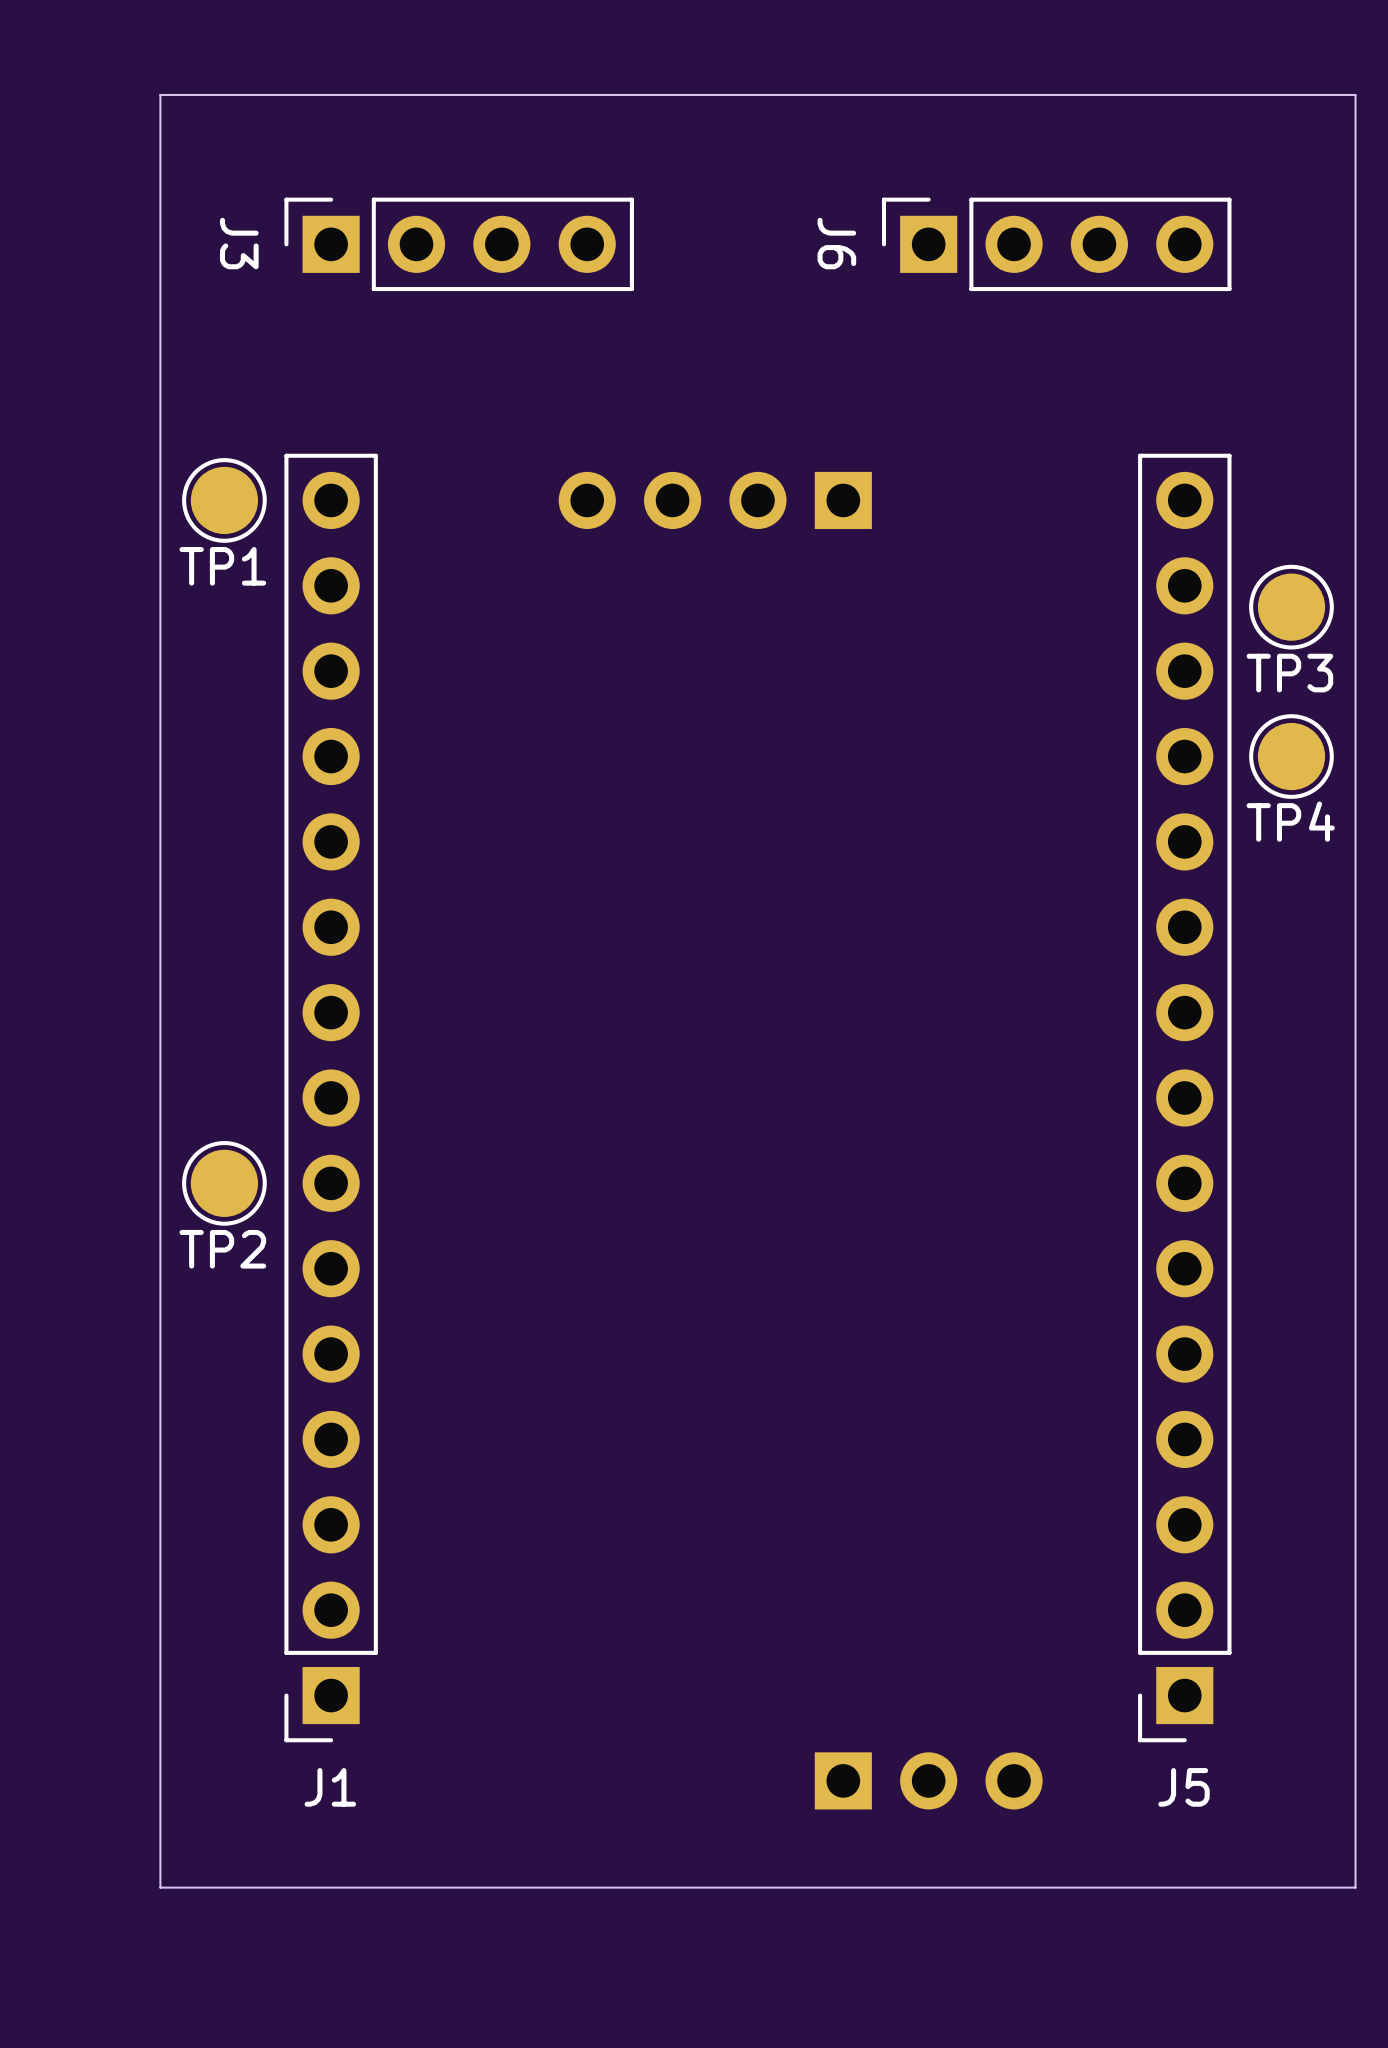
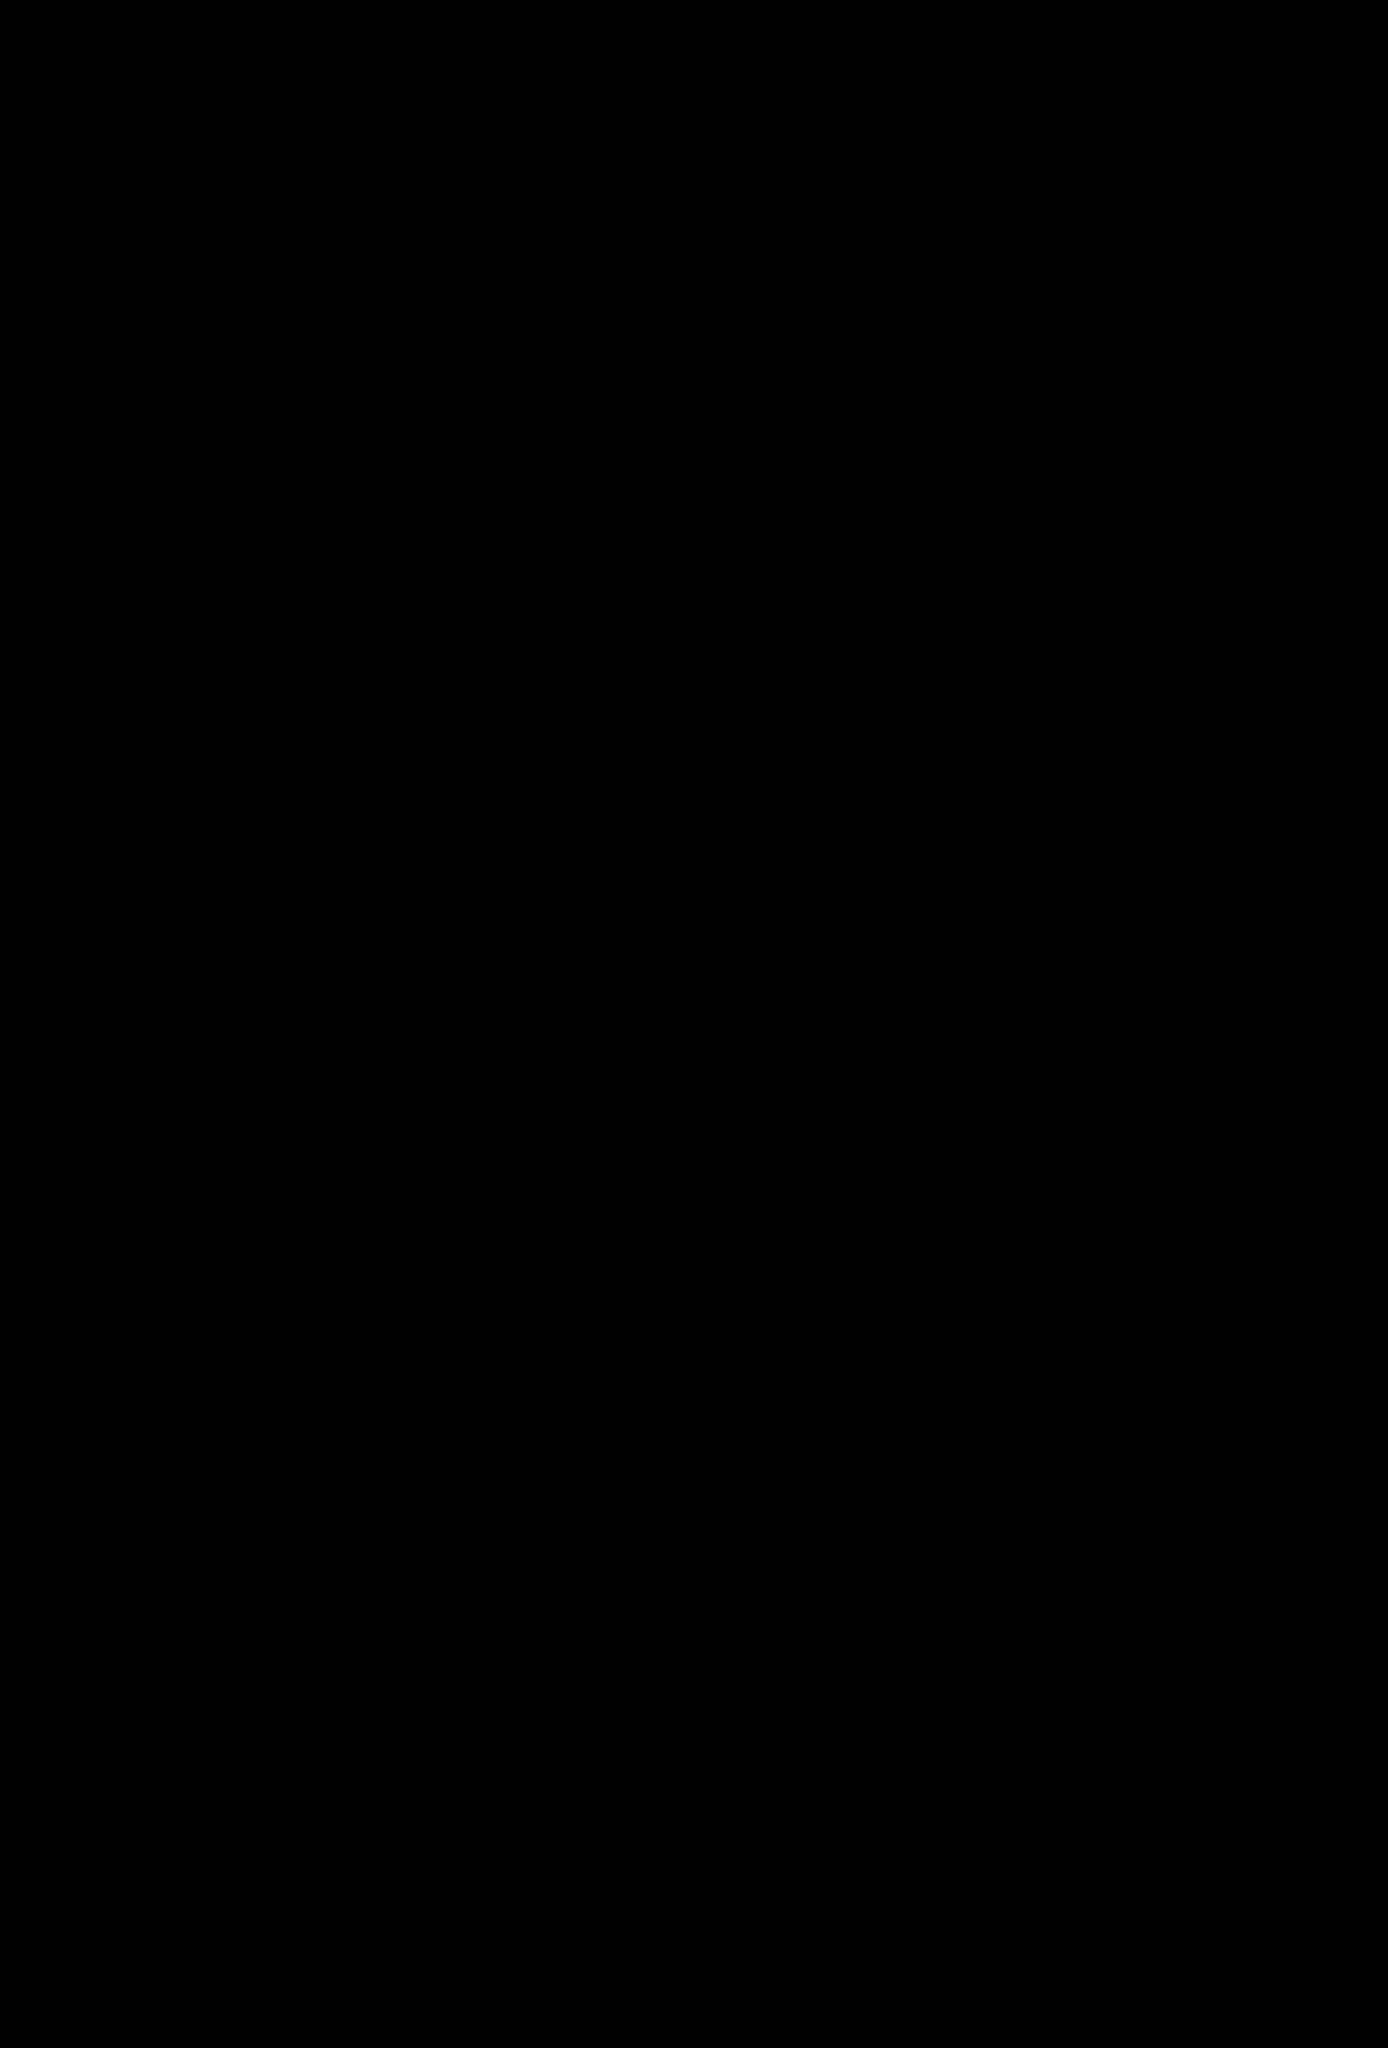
board edge: (1355, 94) (160, 94) (160, 1887) (1355, 1887) (1355, 94) -> none
J3: (459, 244) -> none
J6: (1056, 244) -> none
TP1: (224, 500) -> none
part: (715, 500) -> none
TP3: (1291, 607) -> none
TP4: (1291, 756) -> none
J1: (331, 1098) -> none
J5: (1184, 1098) -> none
TP2: (224, 1183) -> none
part: (928, 1780) -> none

